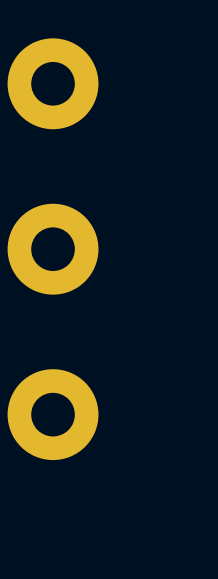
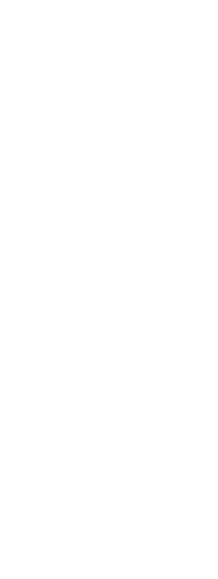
part: (53, 83) -> none
part: (53, 249) -> none
part: (53, 414) -> none

